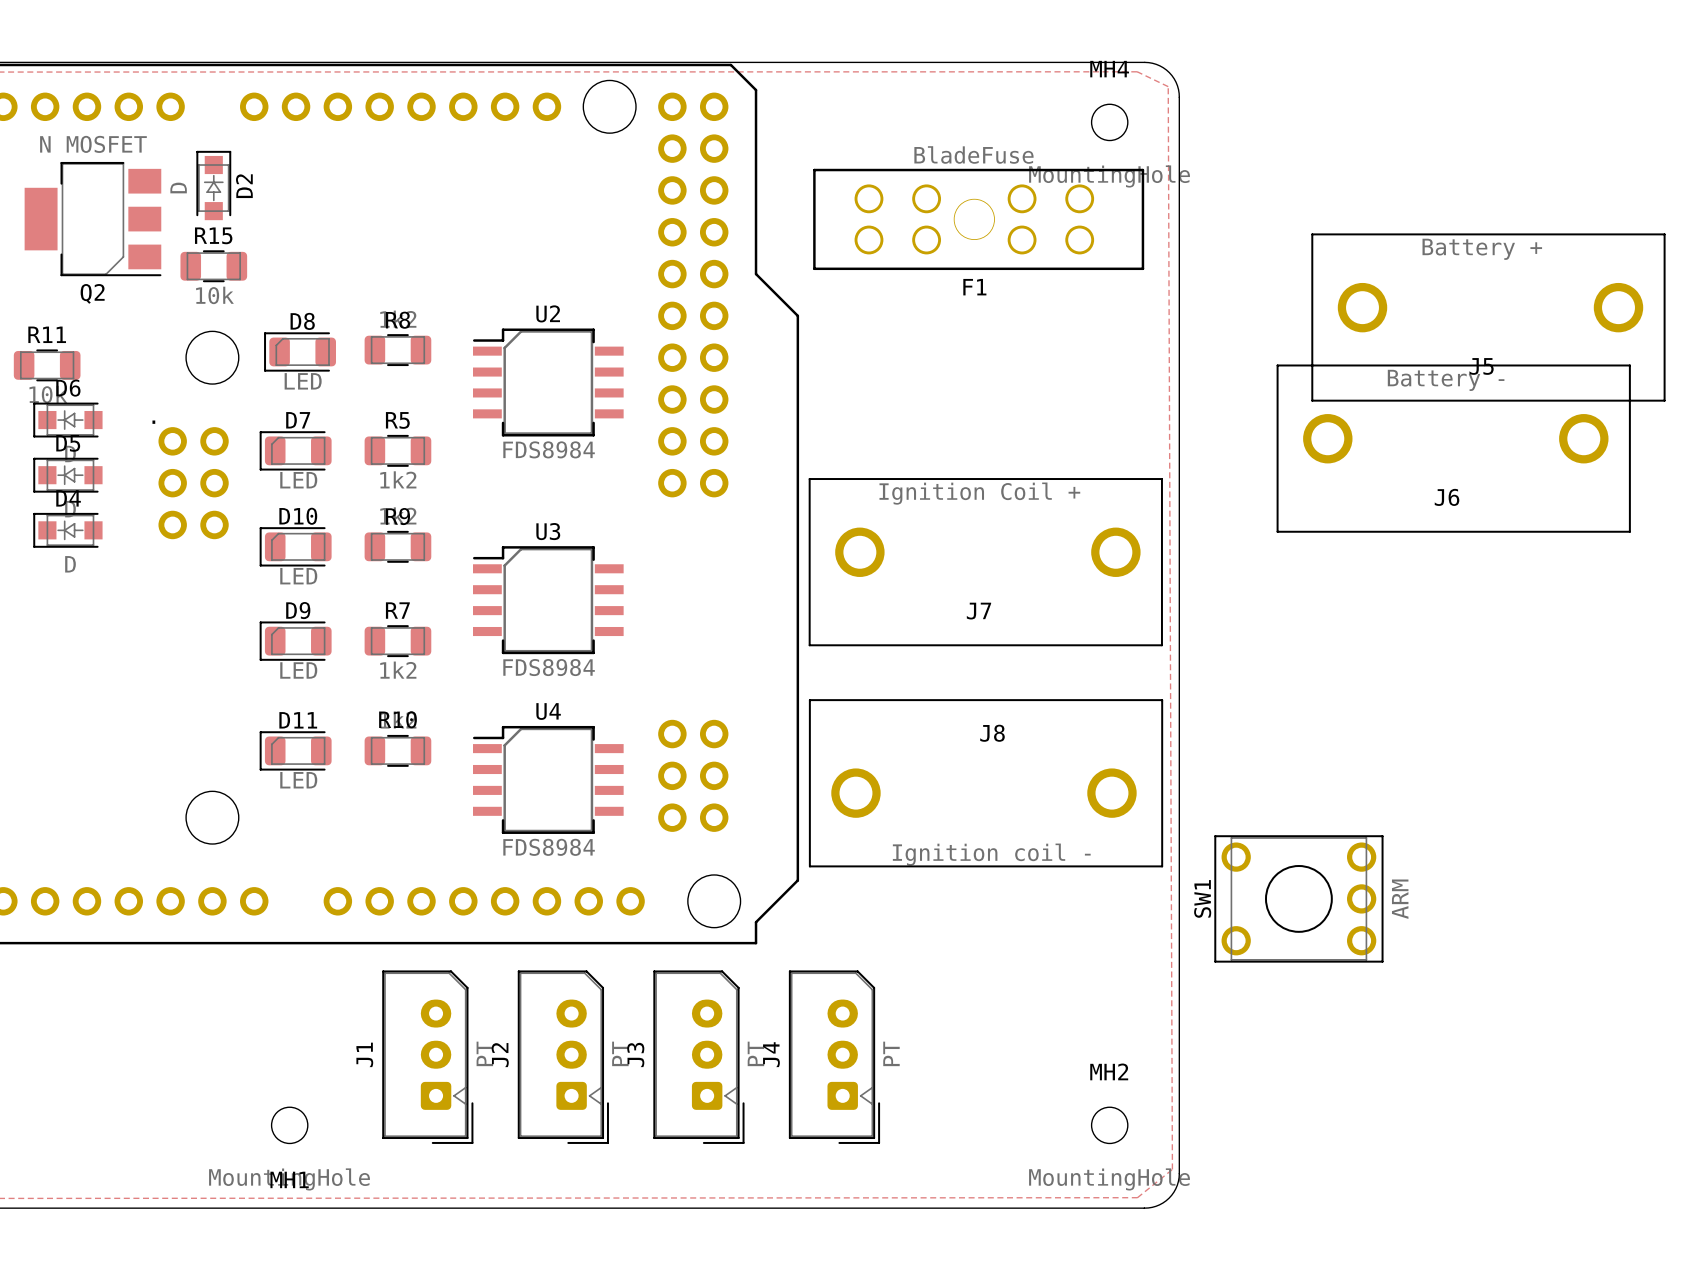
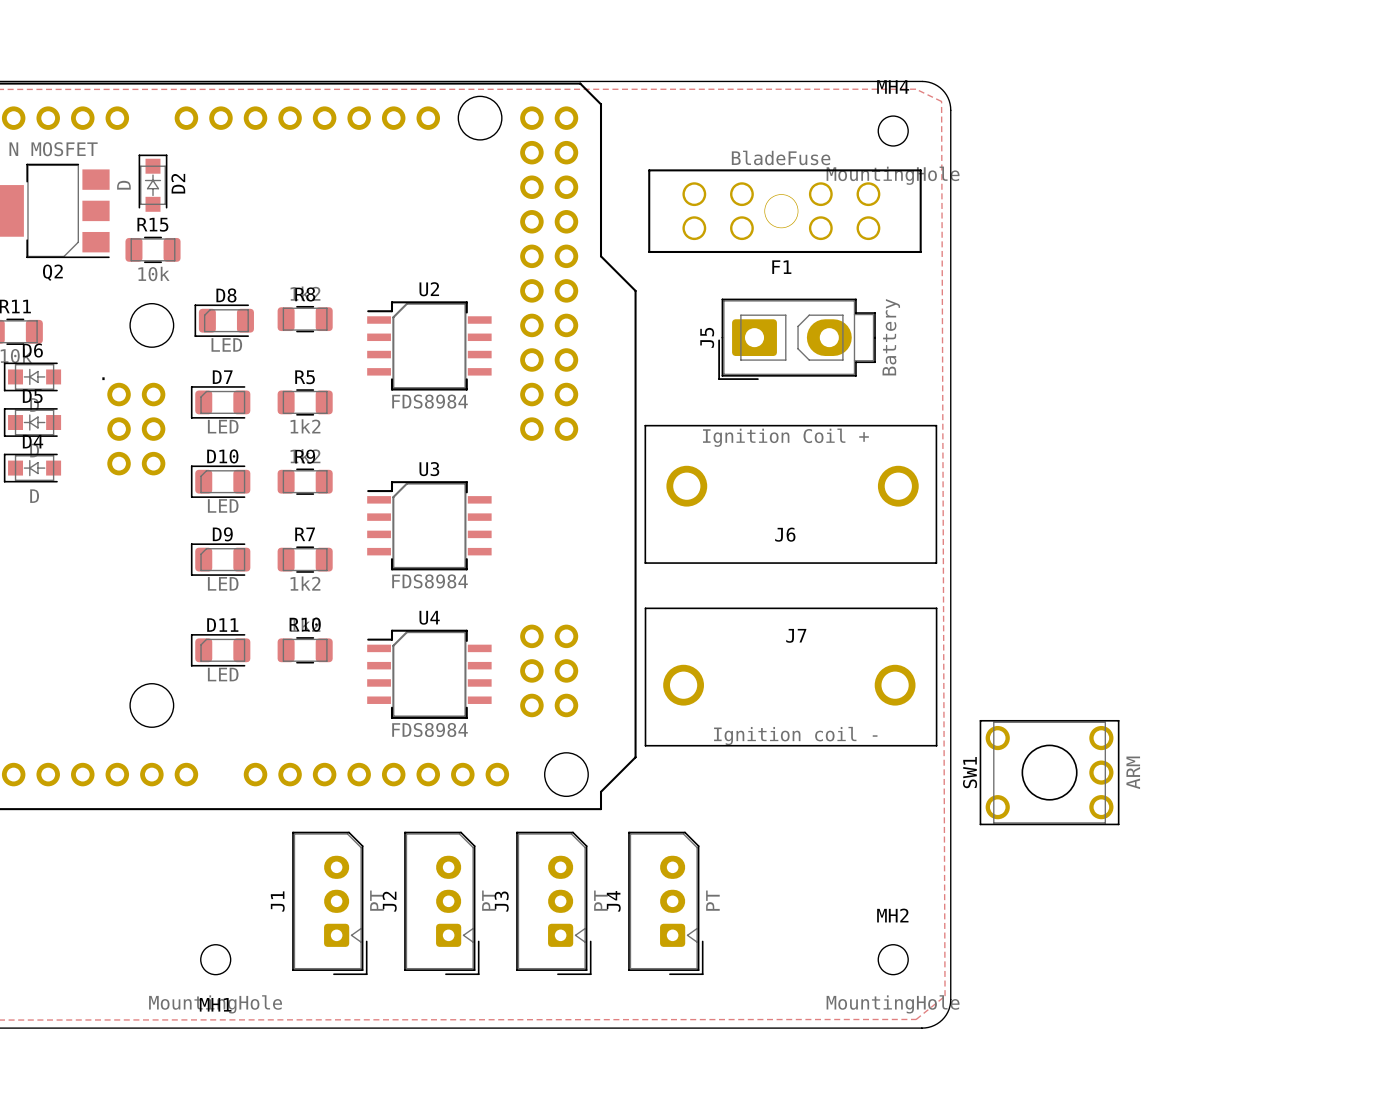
J5 footprint: [1311, 233, 1666, 402] -> [718, 298, 876, 380]
J5 value: Battery + (1482, 249) -> Battery (891, 337)
J5 name position: J5 (1481, 366) -> J5 (707, 337)
J6: Battery - (1453, 448) -> none
J7 name: J7 (978, 611) -> J6 (785, 534)
J8 name: J8 (992, 733) -> J7 (796, 635)

